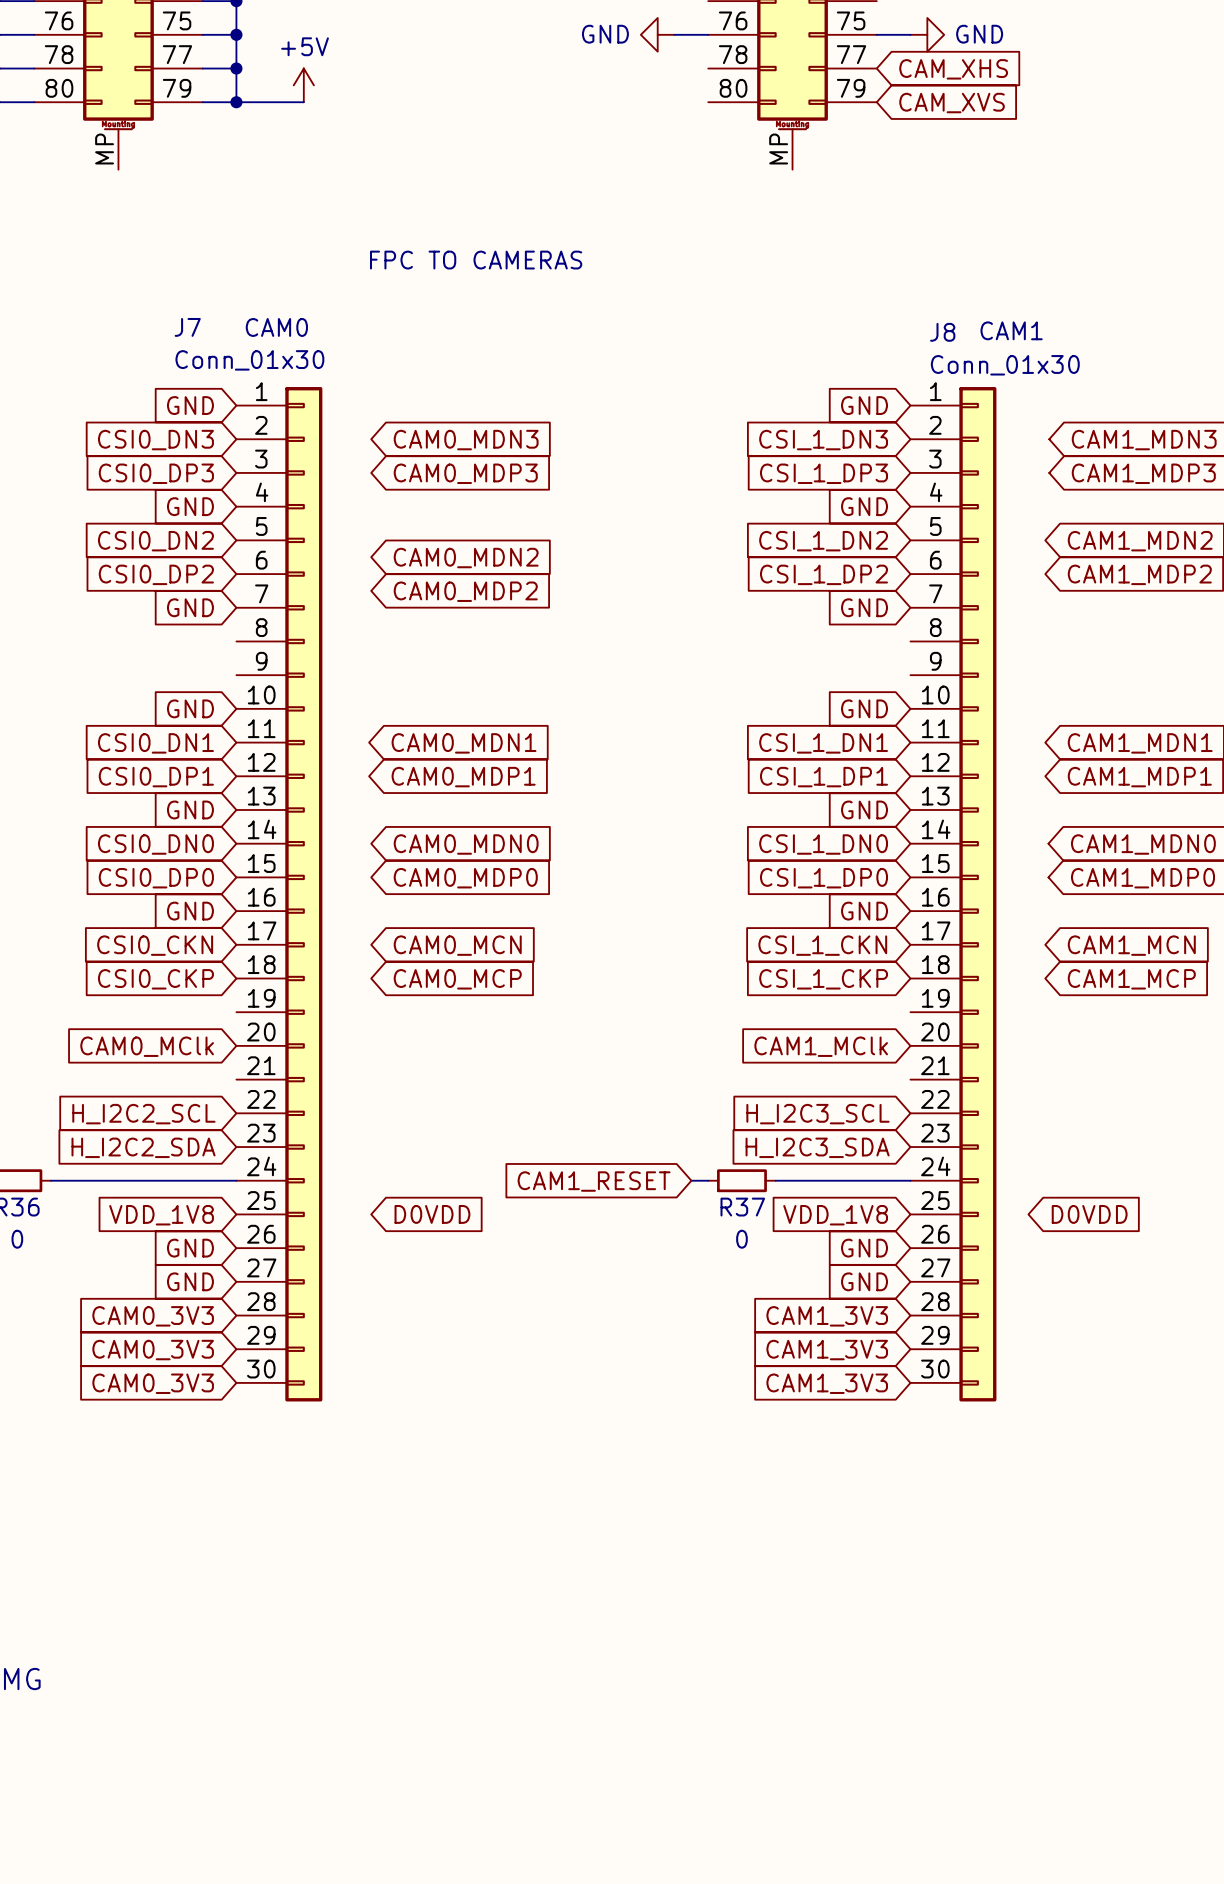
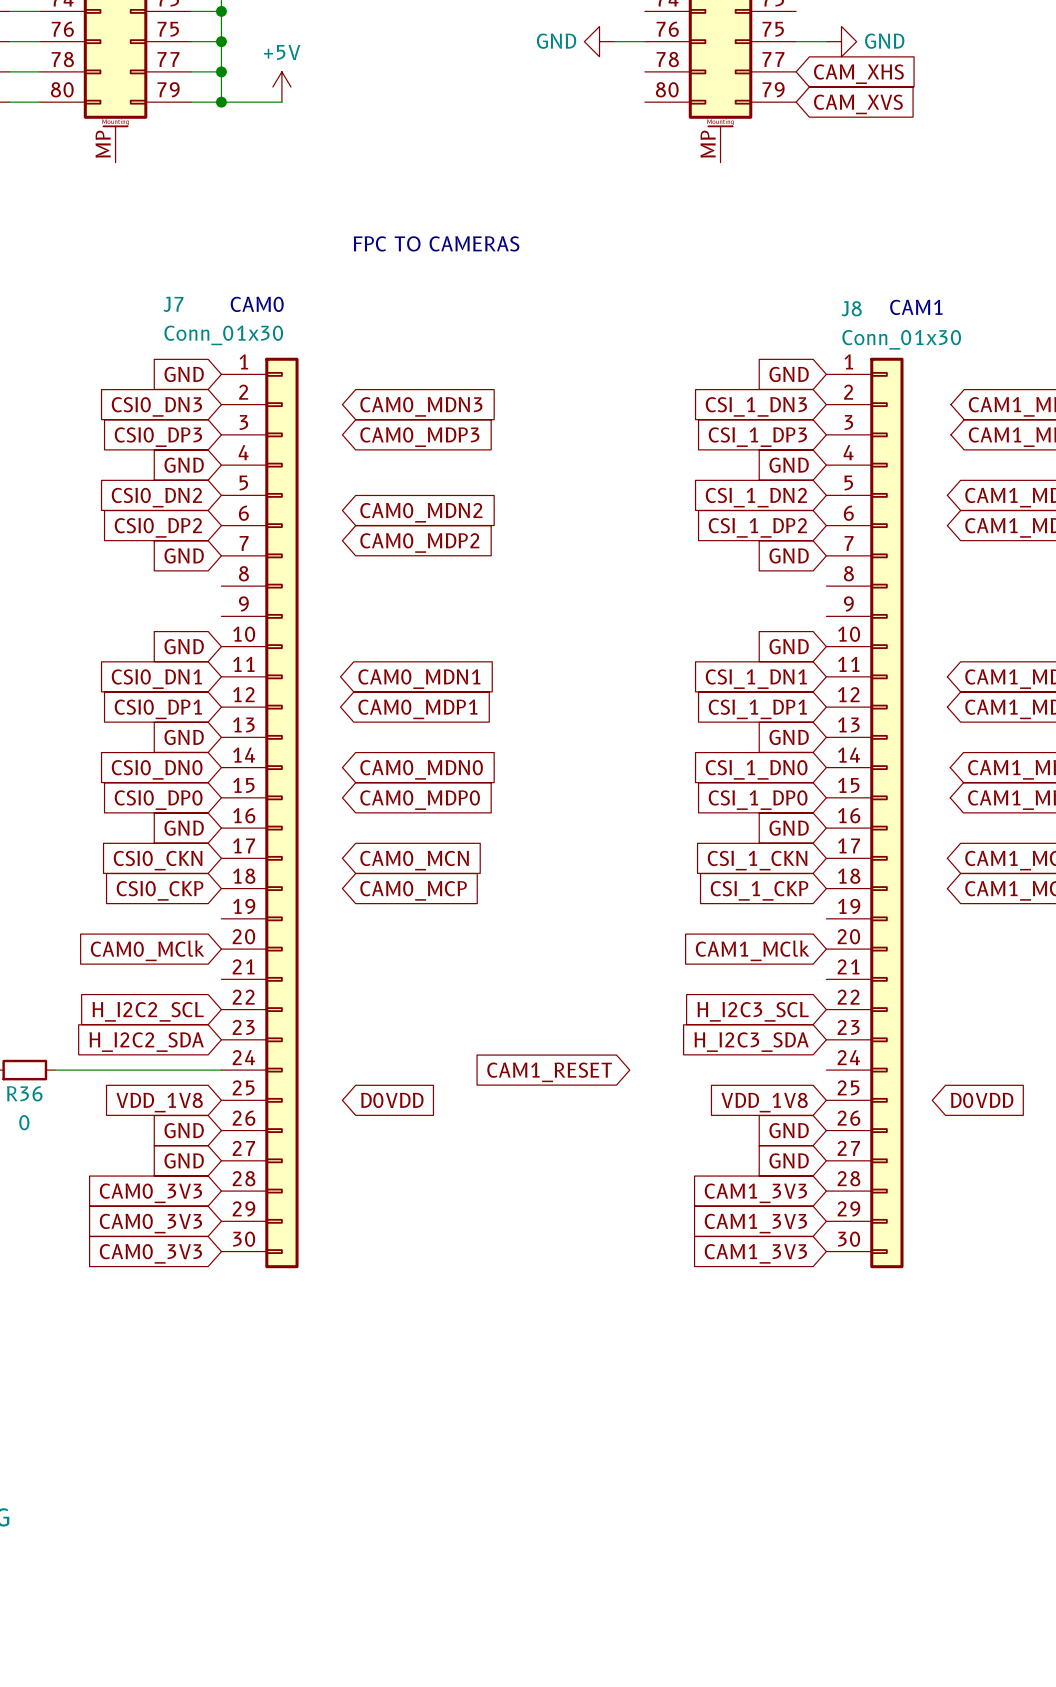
wire: (691, 1180) (708, 1180) -> none
R37: 0 (741, 1180) -> none
wire: (775, 1180) (910, 1180) -> none

